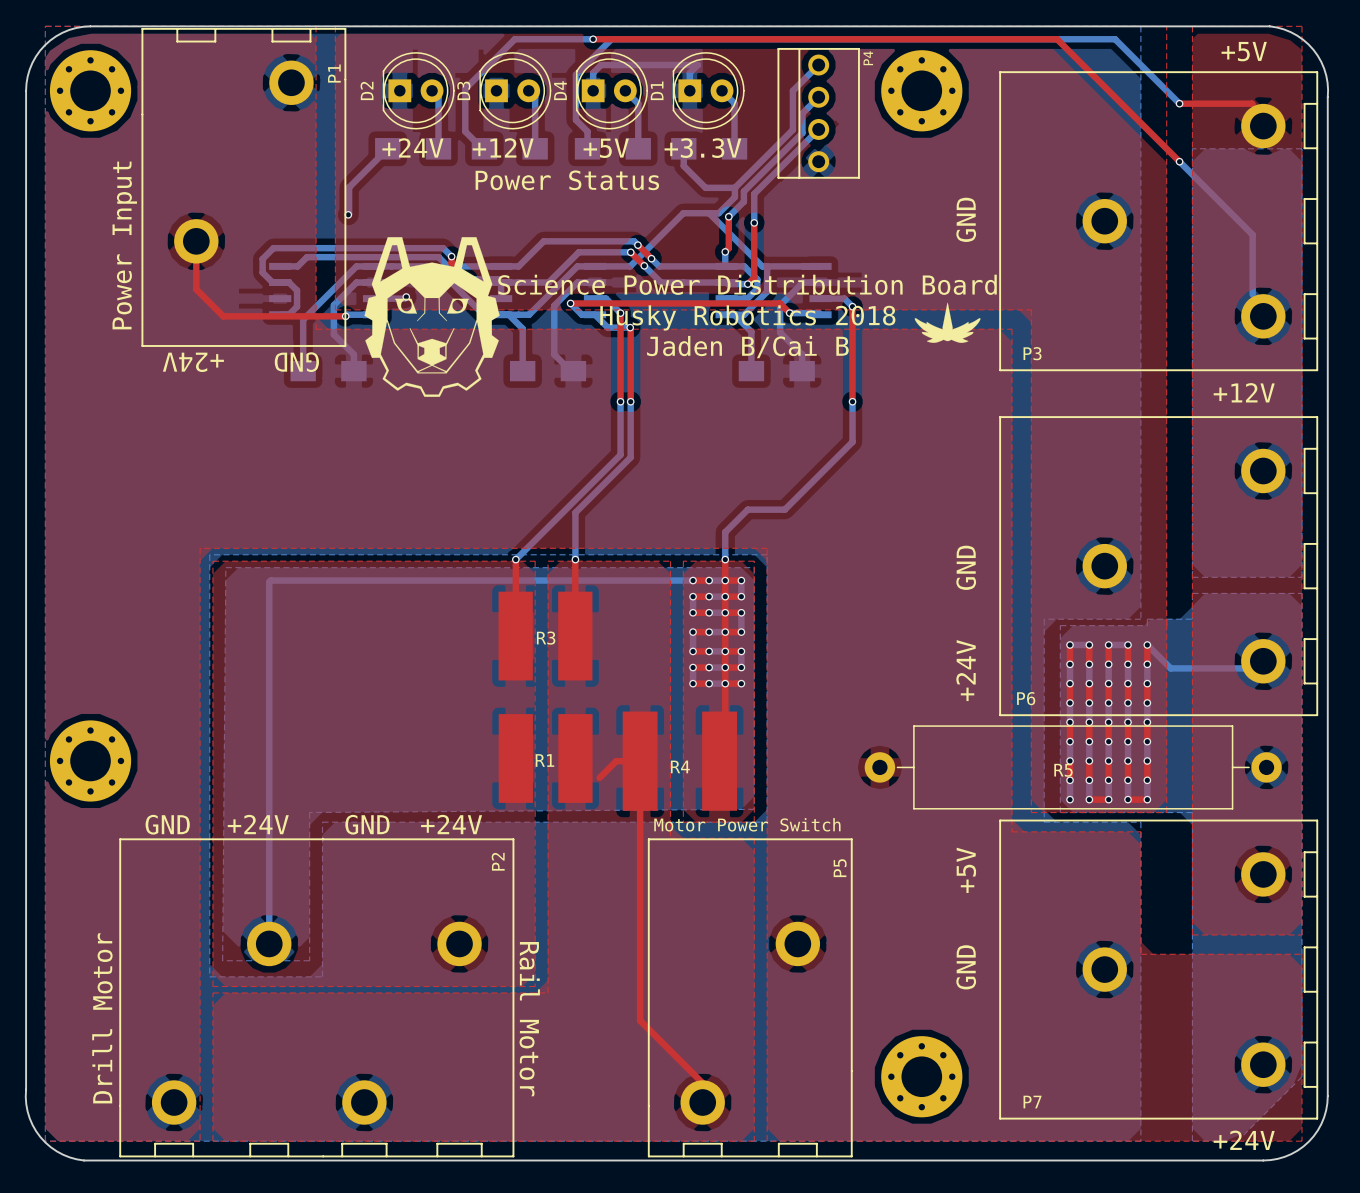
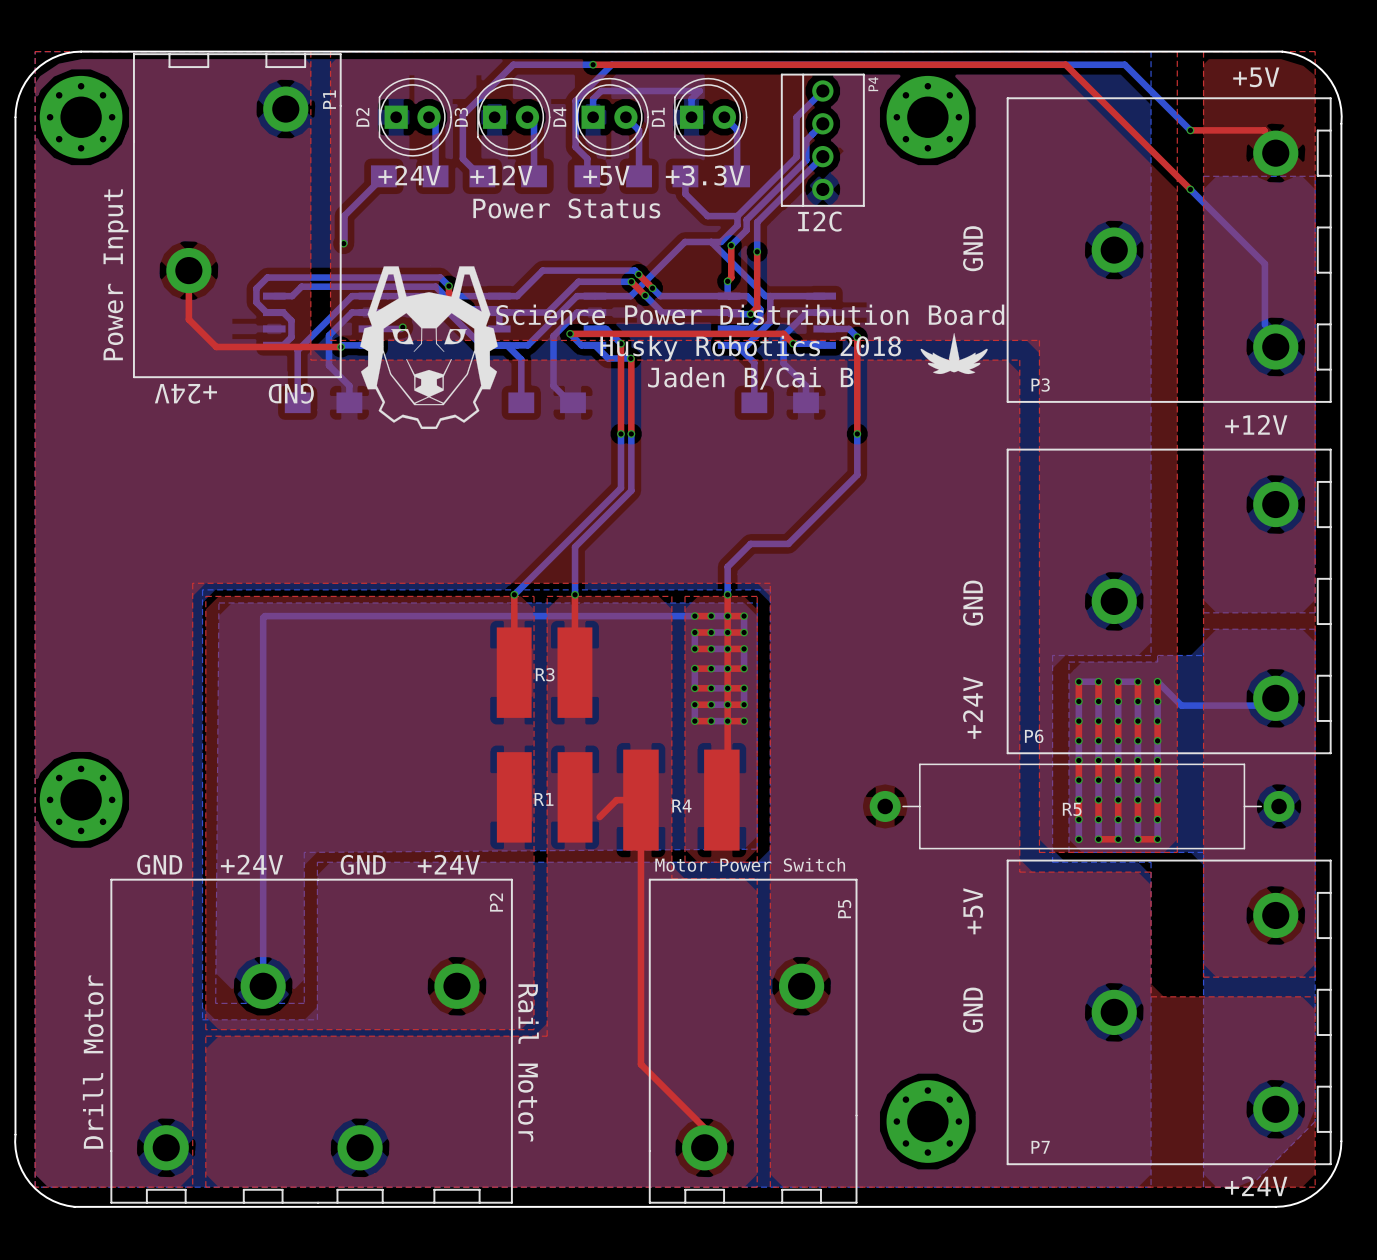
text: none -> I2C (819, 221)

